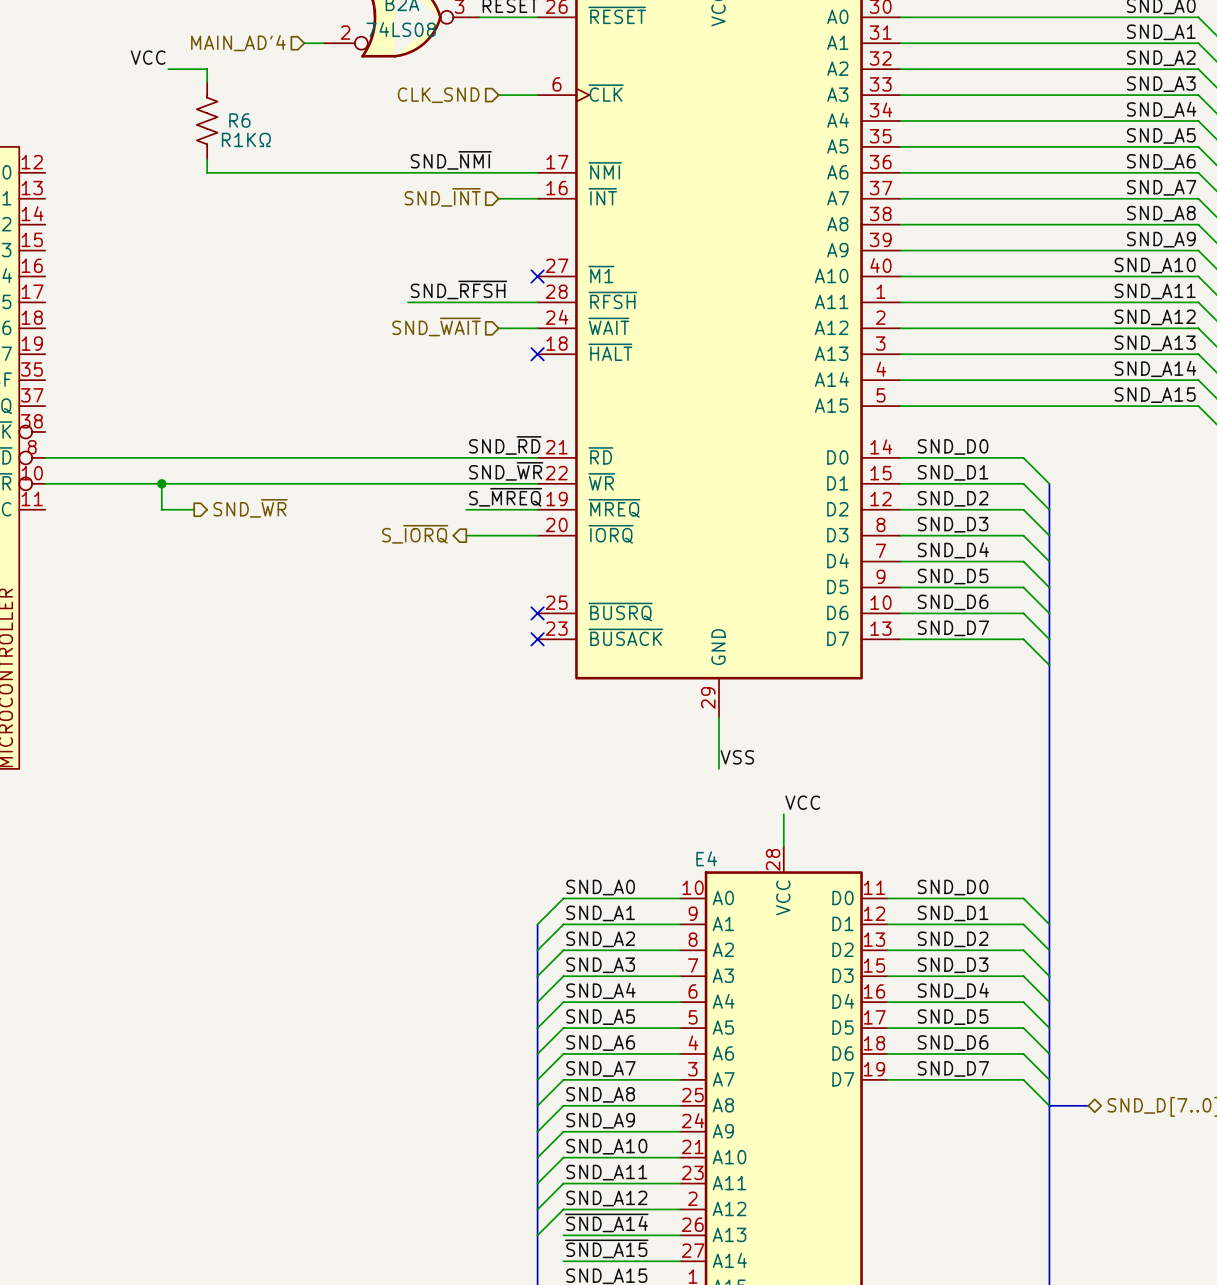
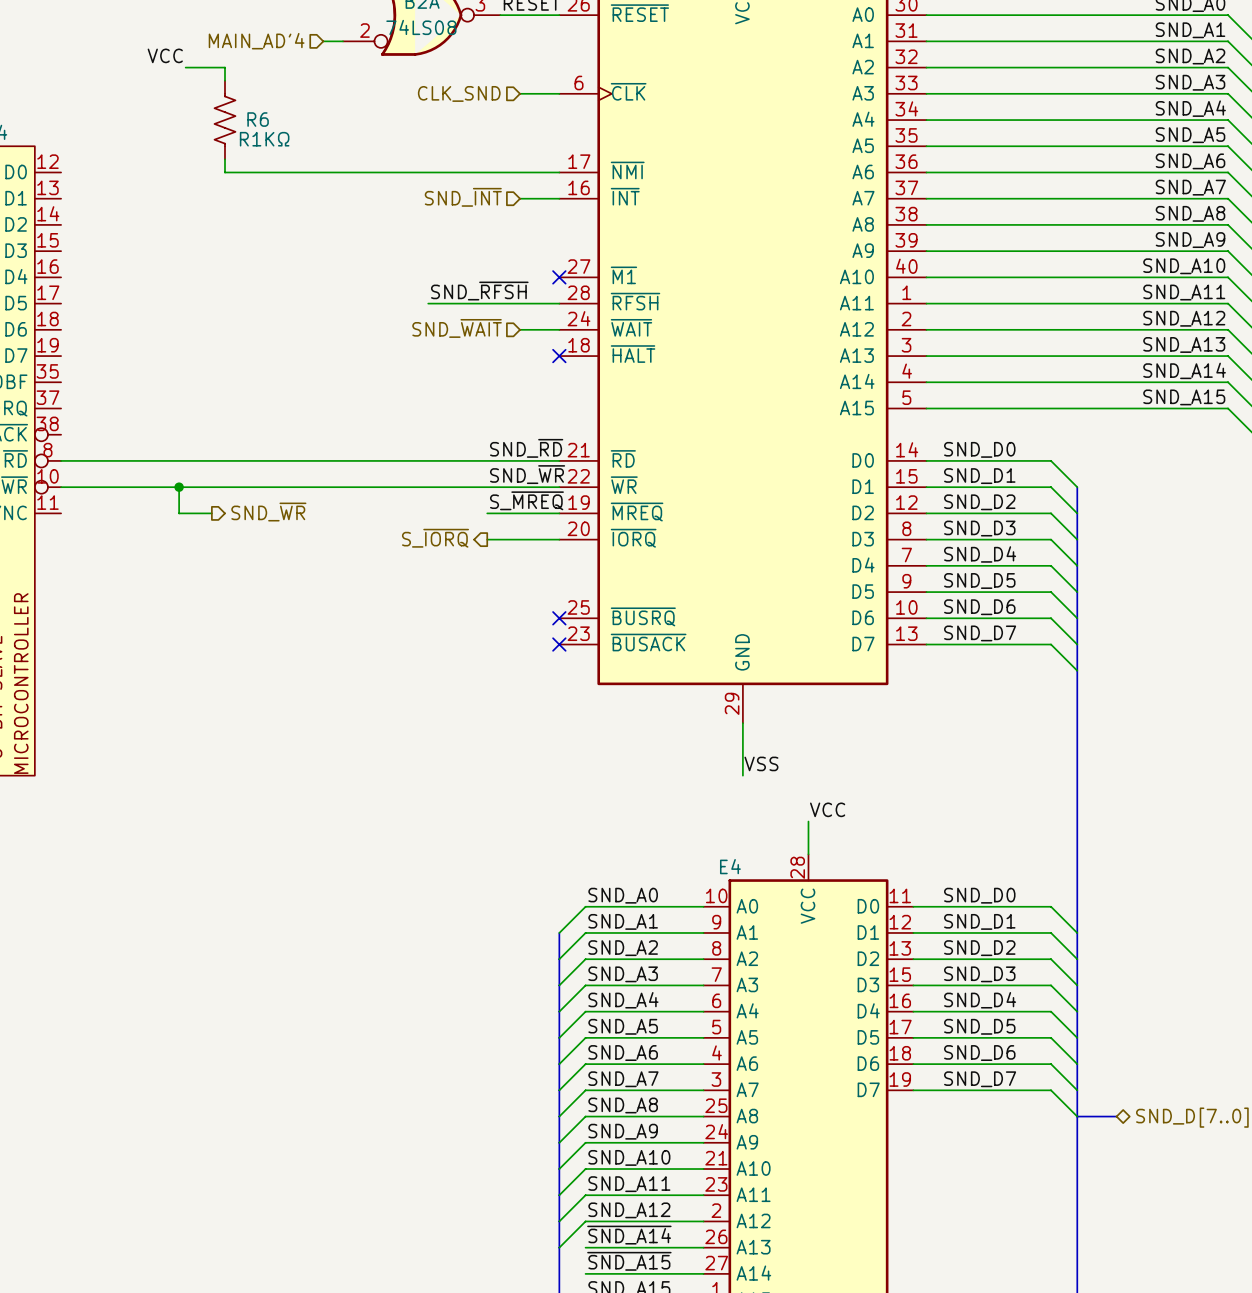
label: SND_~{NMI} (451, 160) -> none

